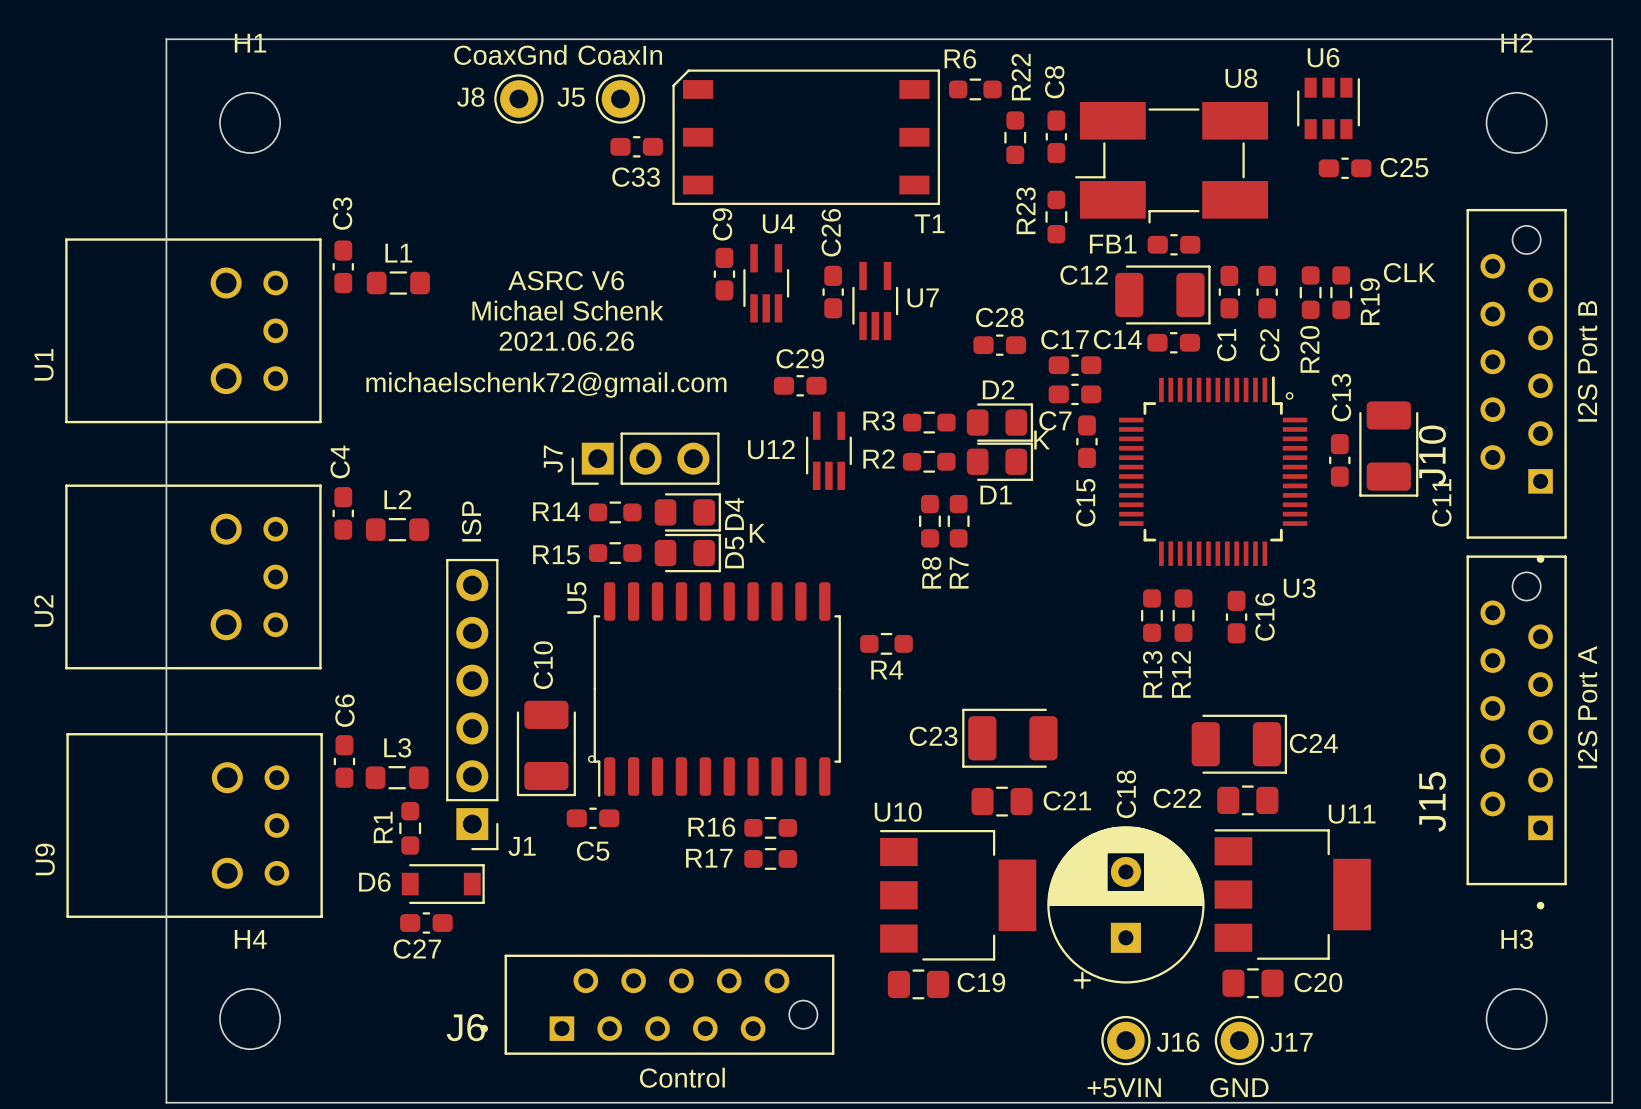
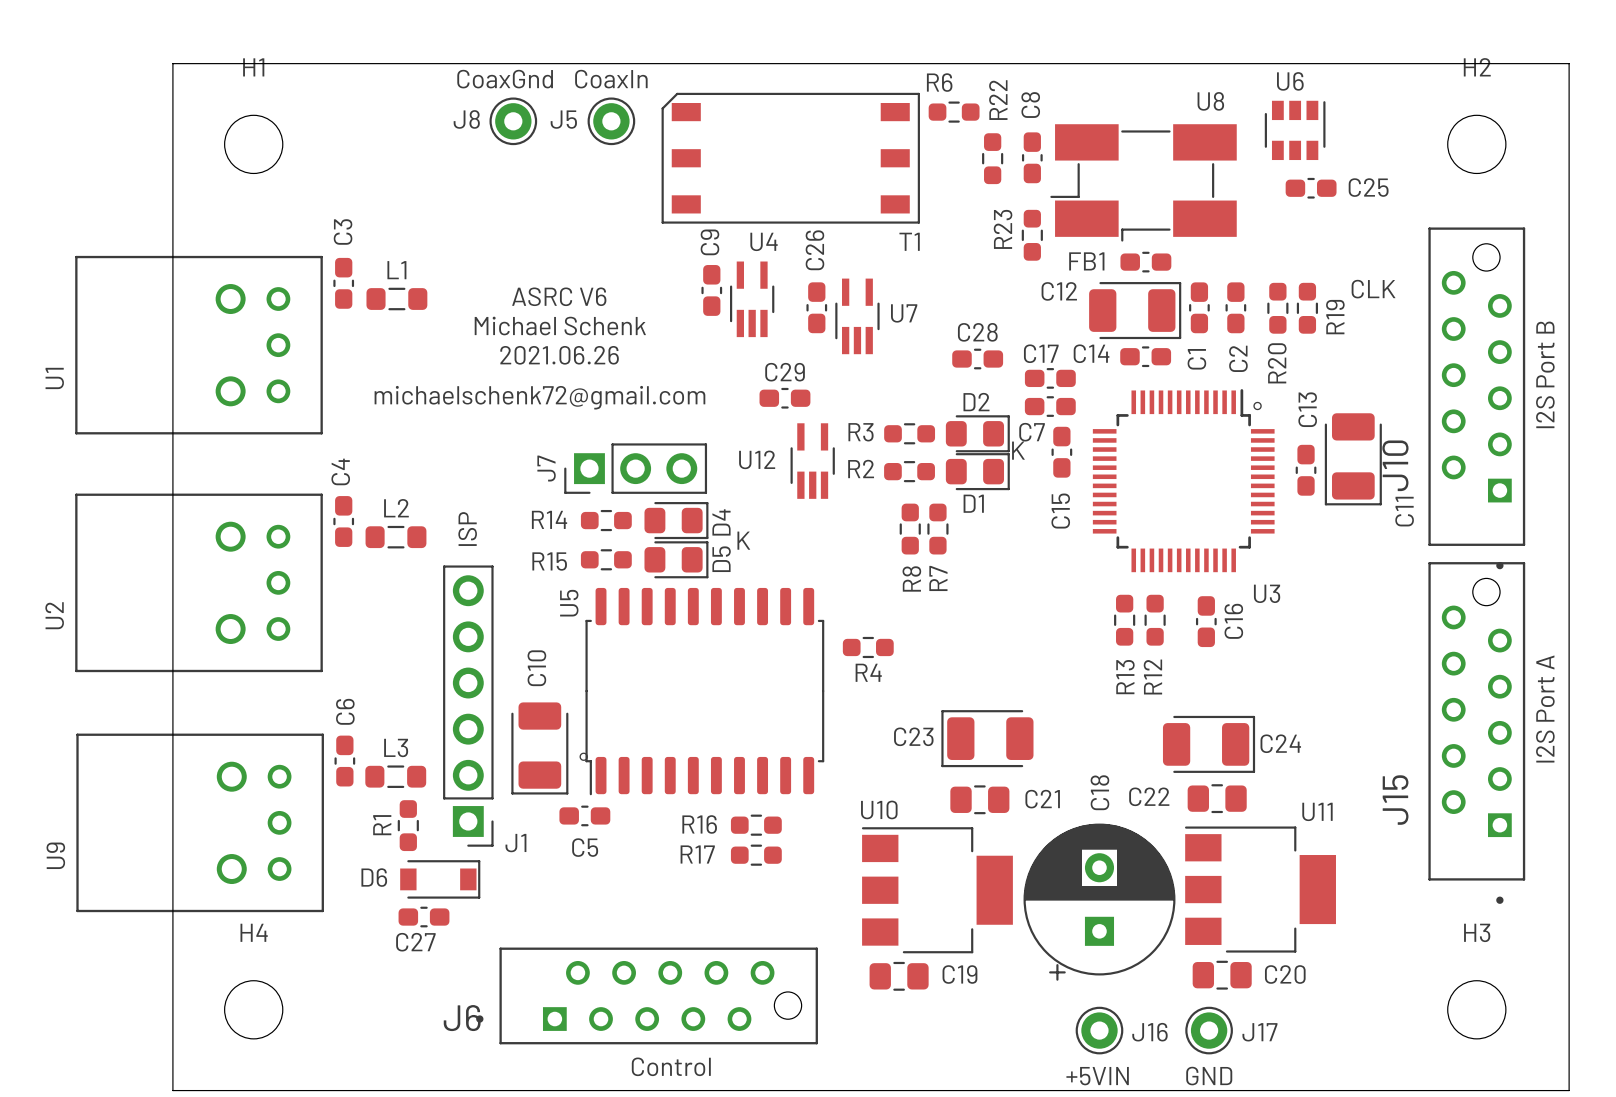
C33: (636, 146) -> none

